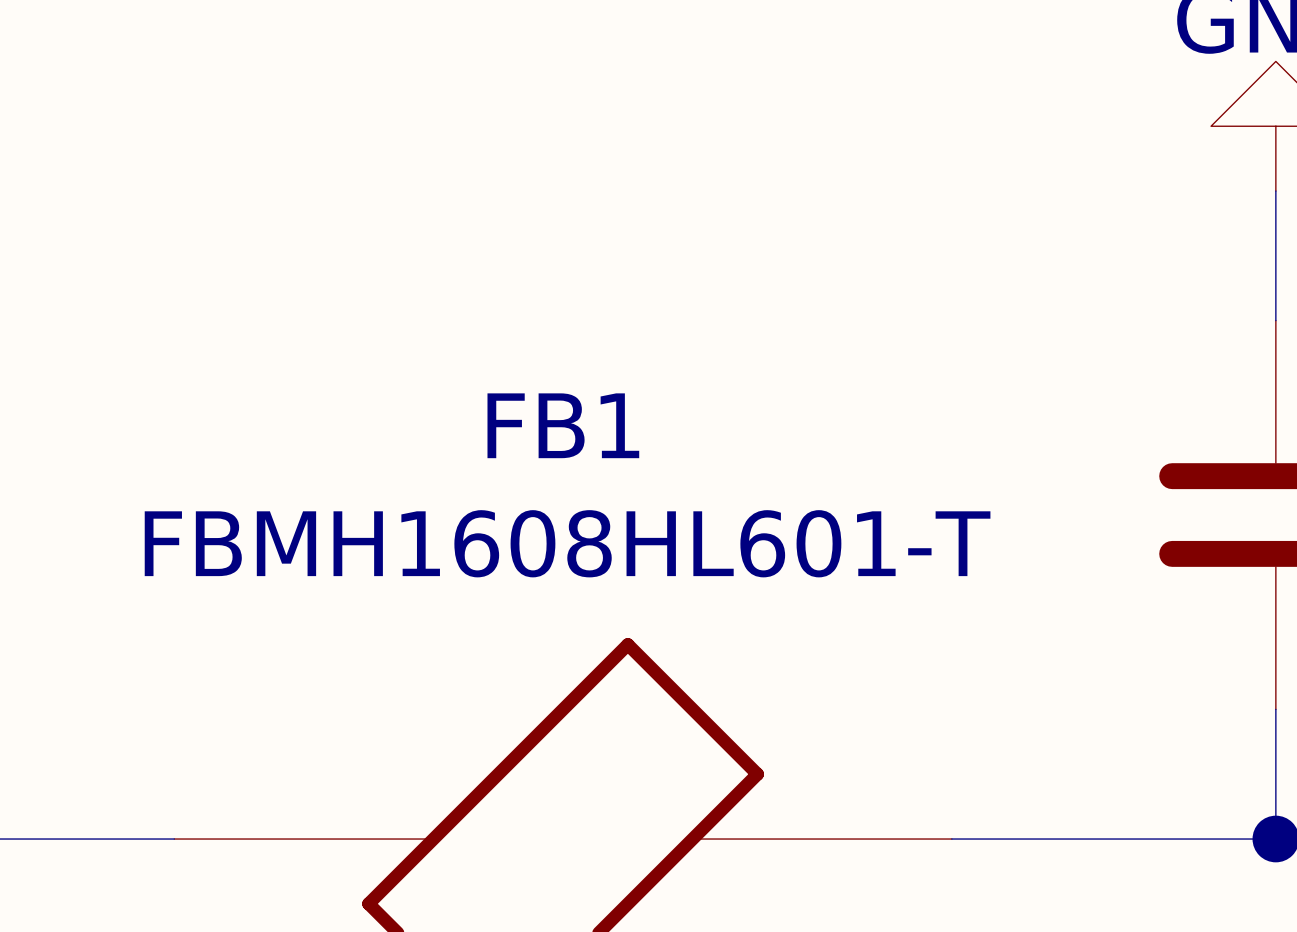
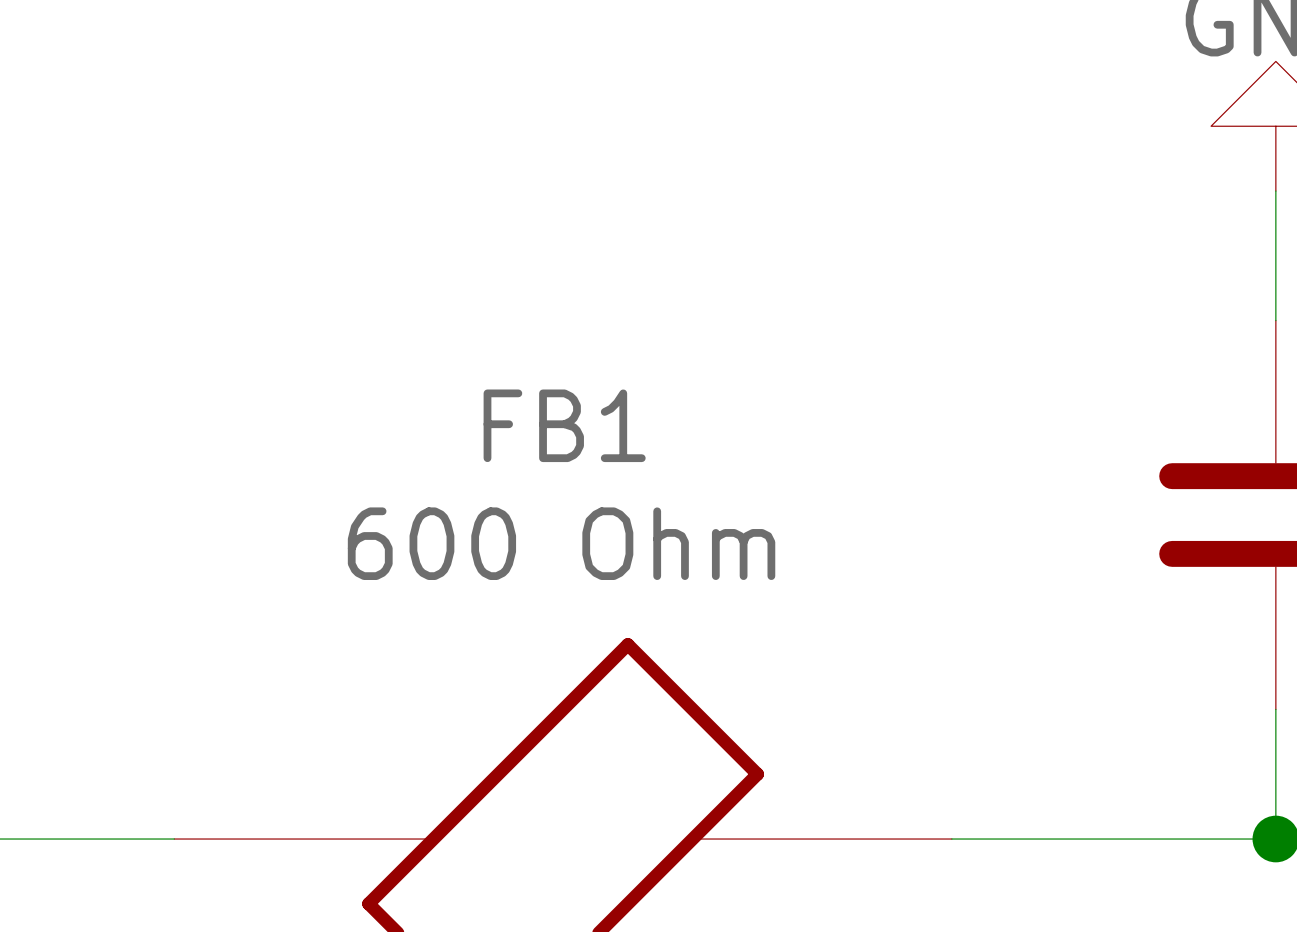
FB1 value: FBMH1608HL601-T (567, 543) -> 600 Ohm (561, 543)

